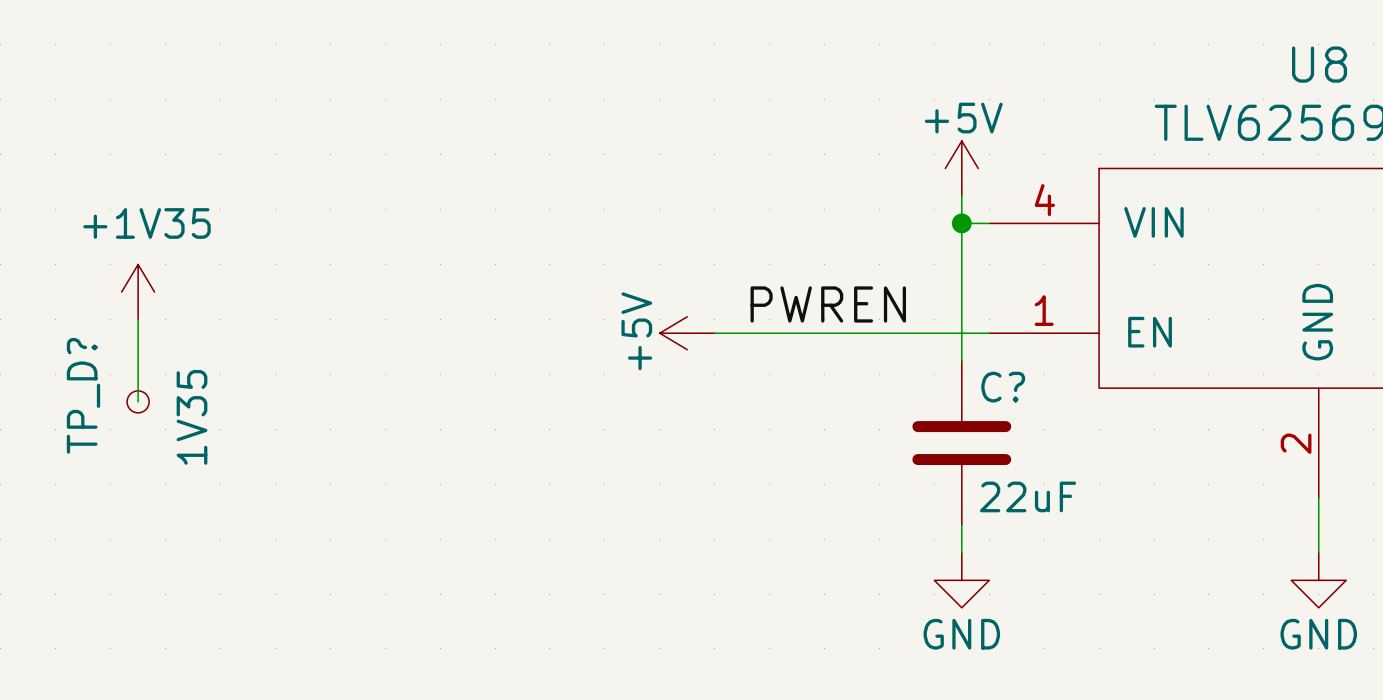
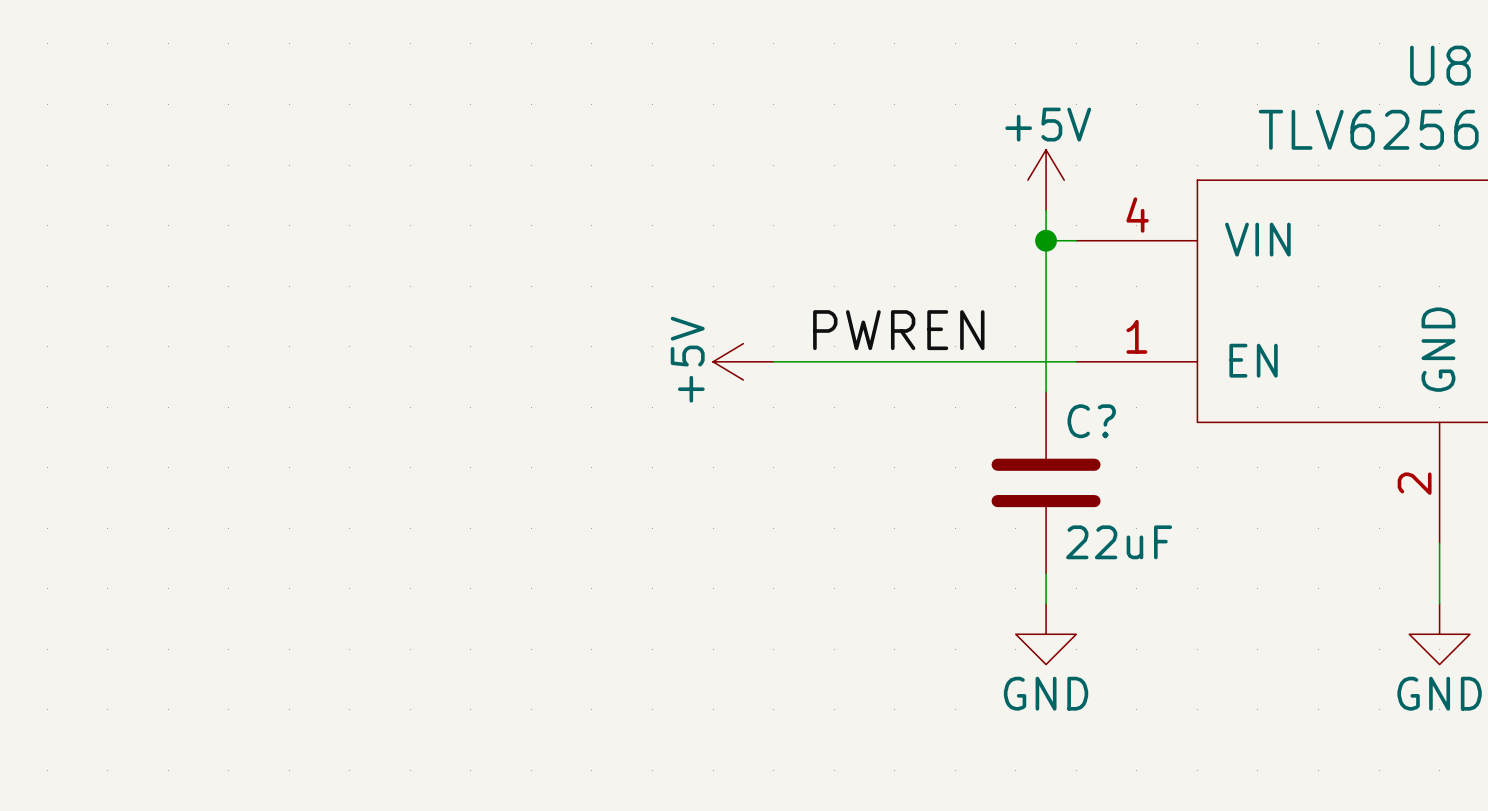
power symbol: +1V35 (138, 292) -> none
wire: (138, 319) (138, 401) -> none
TP_D?: 1V35 (138, 401) -> none

